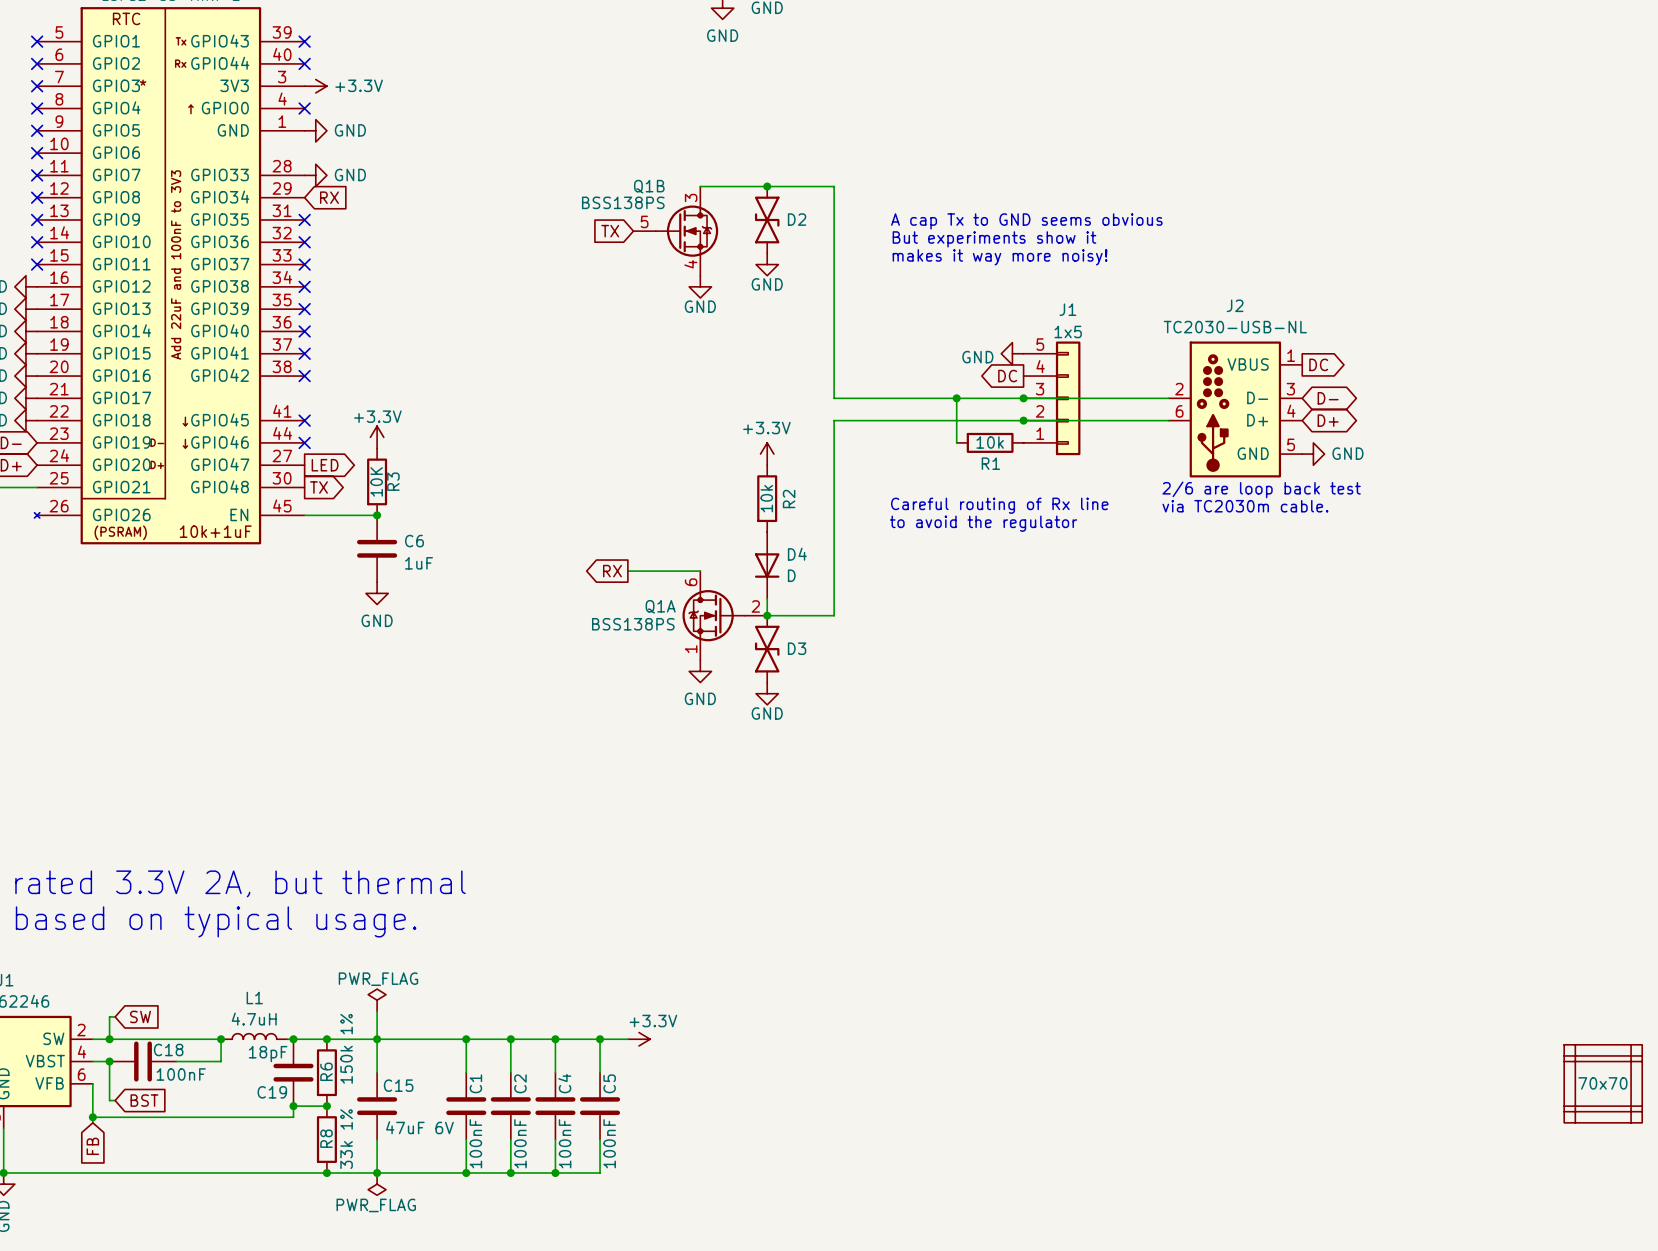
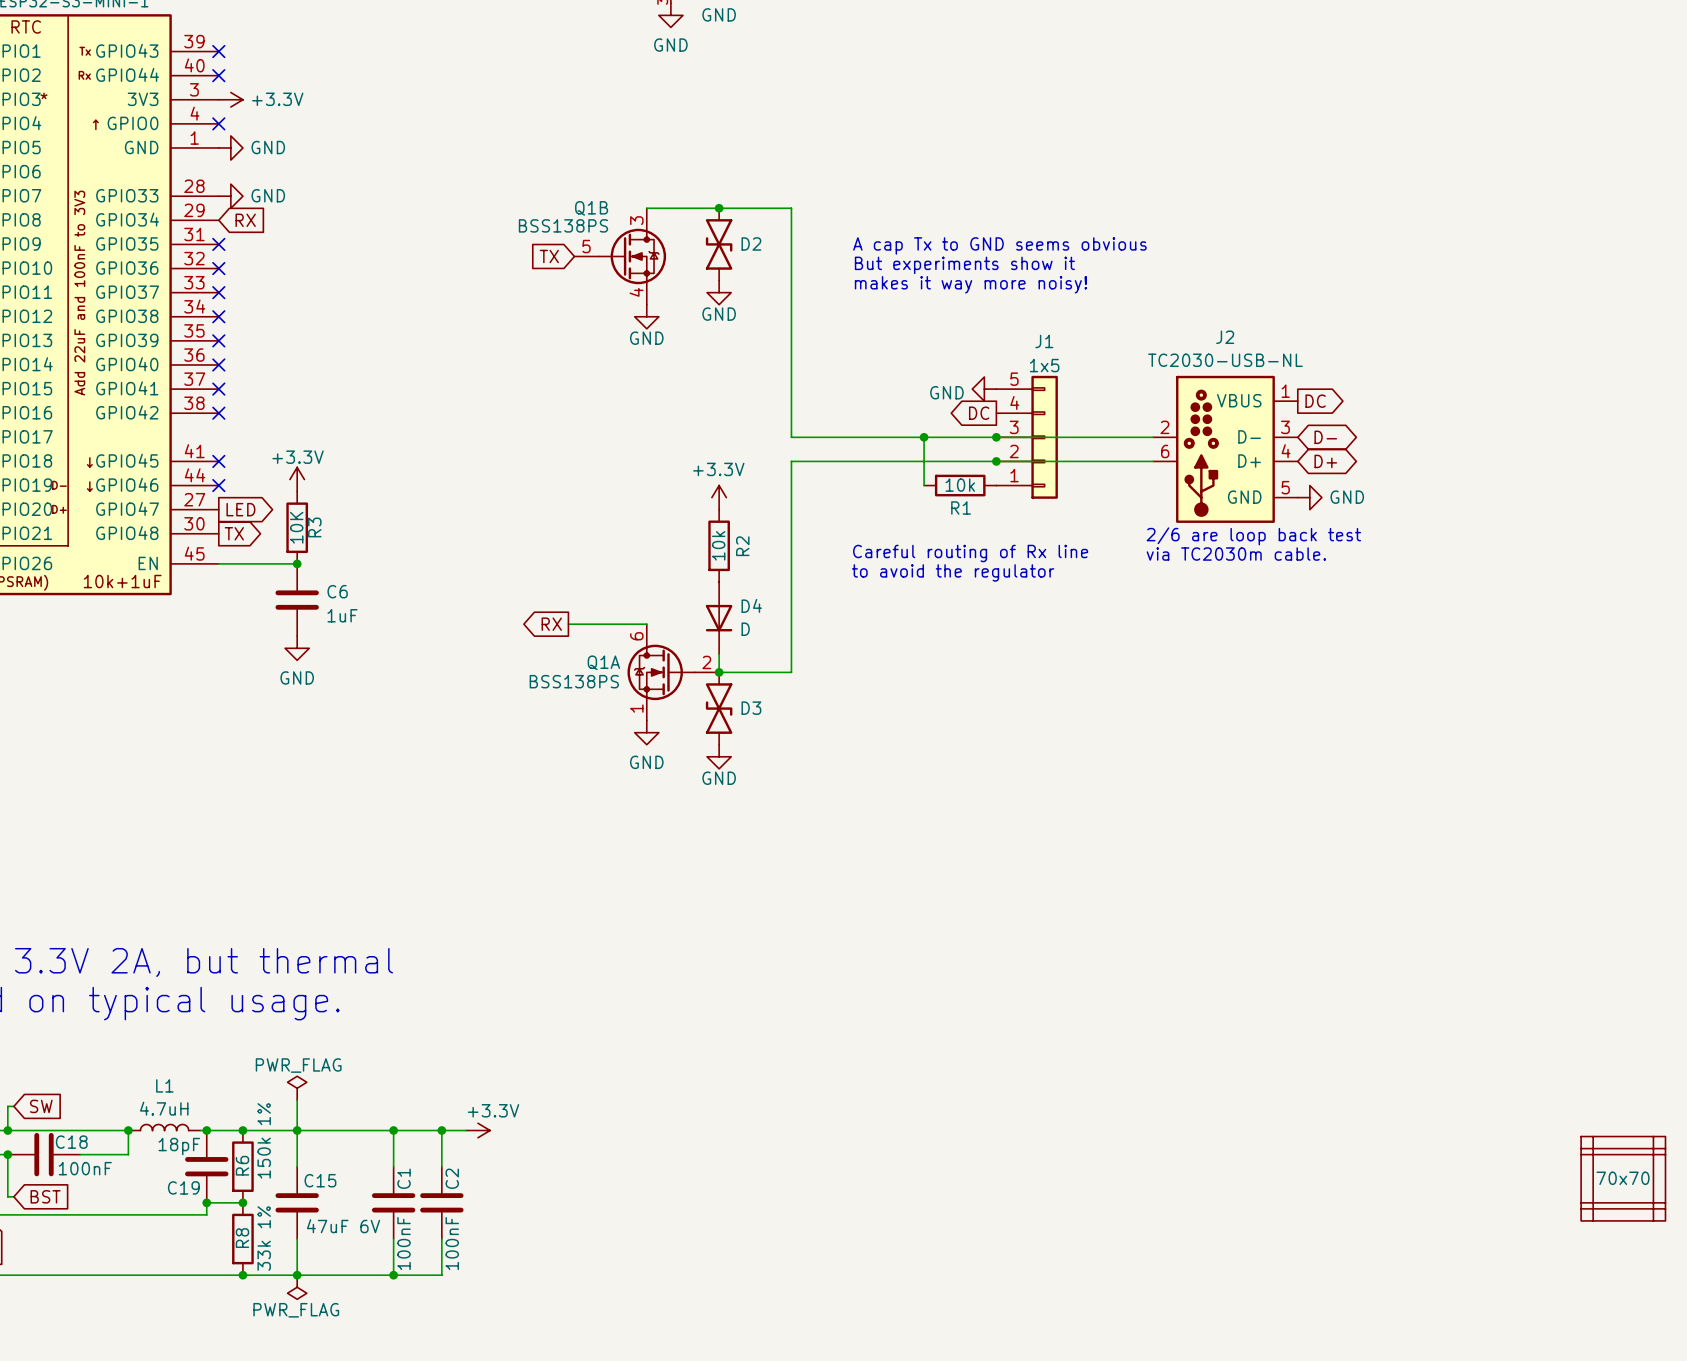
wire: (533, 1039) (627, 1039) -> none
wire: (555, 1039) (555, 1072) -> none
junction: (555, 1039) -> none
wire: (600, 1039) (600, 1072) -> none
junction: (600, 1039) -> none
power symbol position: +3.3V (639, 1039) -> +3.3V (478, 1130)
C4: 100nF (555, 1106) -> none
C5: 100nF (600, 1106) -> none
wire: (555, 1139) (555, 1173) -> none
wire: (600, 1139) (600, 1173) (510, 1173) -> none
junction: (510, 1173) -> none
junction: (555, 1173) -> none

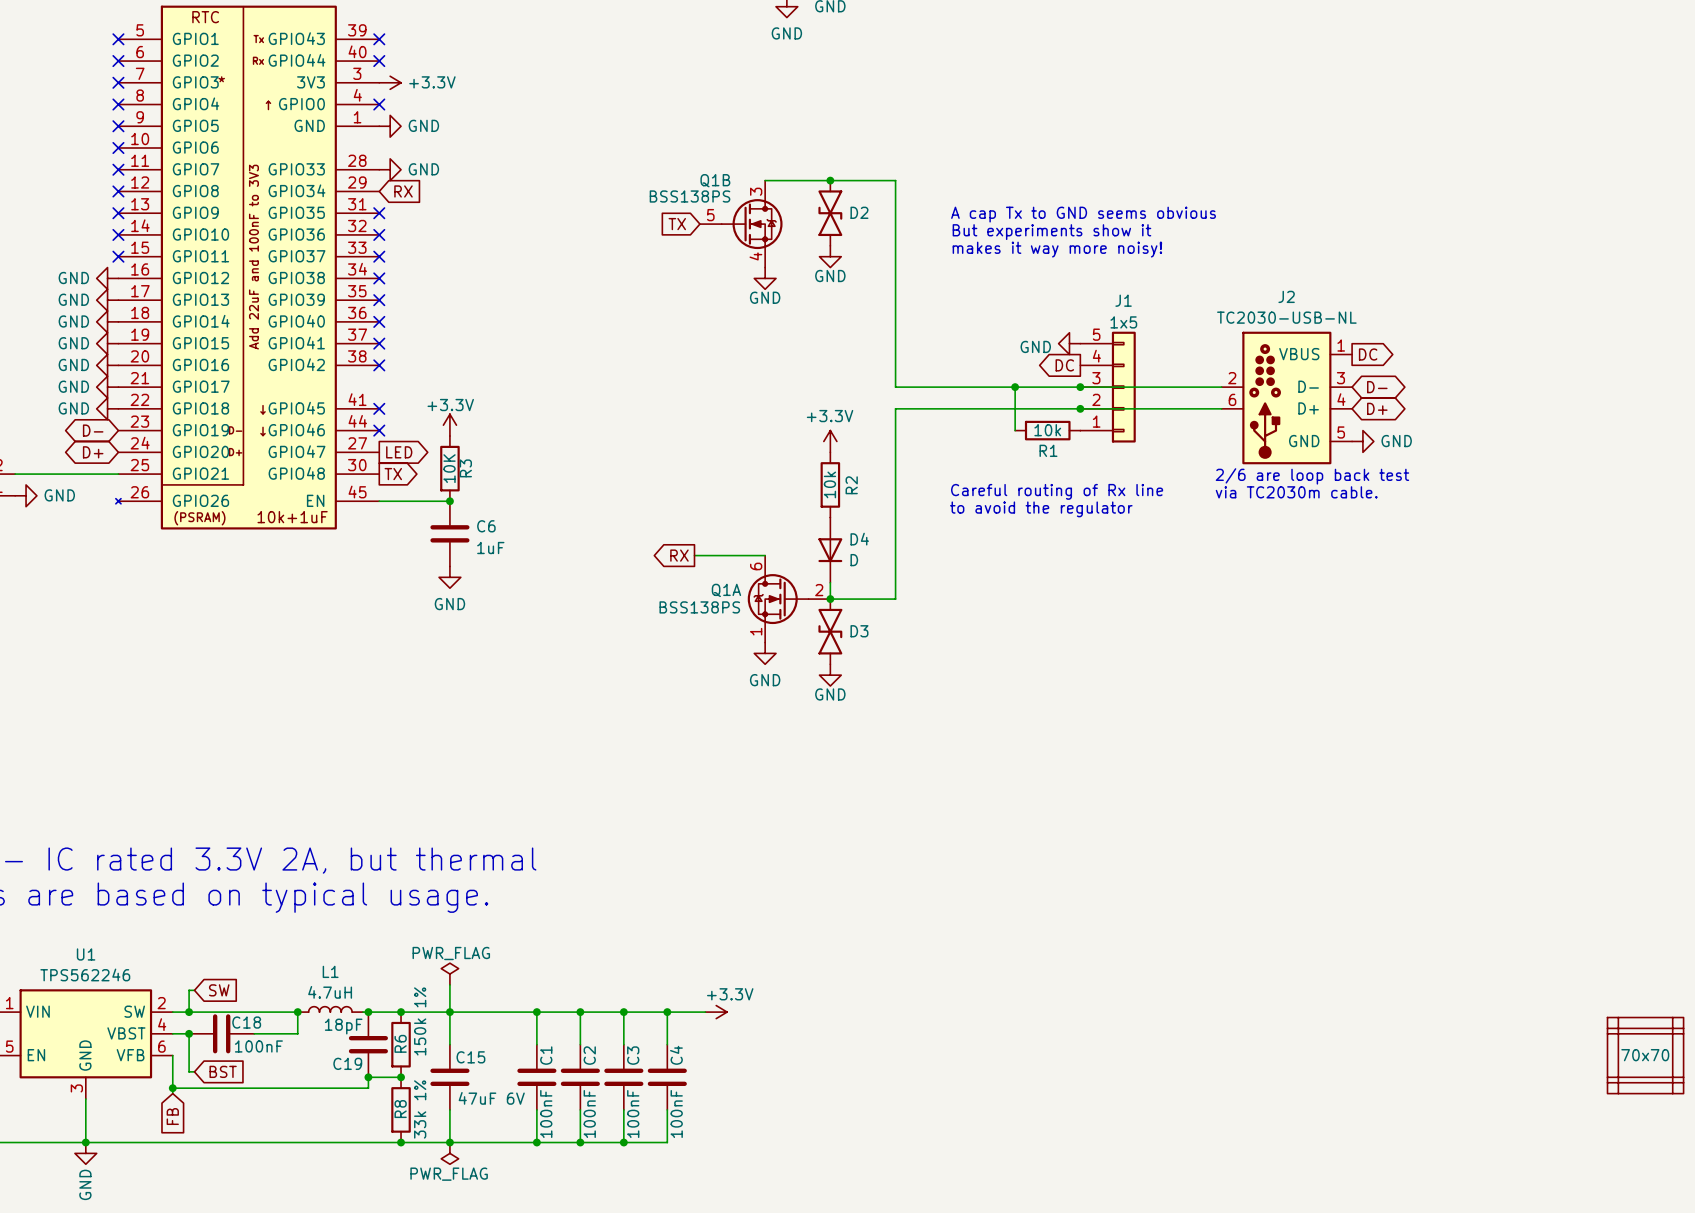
wire: none -> (602, 1012) (705, 1012)
power symbol position: +3.3V (478, 1130) -> +3.3V (716, 1012)
wire: none -> (623, 1012) (623, 1044)
junction: none -> (623, 1012)
wire: none -> (667, 1012) (667, 1044)
junction: none -> (667, 1012)
C3: none -> 100nF (623, 1077)
C4: none -> 100nF (667, 1077)
wire: none -> (623, 1109) (623, 1142)
wire: none -> (667, 1109) (667, 1142) (580, 1142)
junction: none -> (580, 1142)
junction: none -> (623, 1142)

